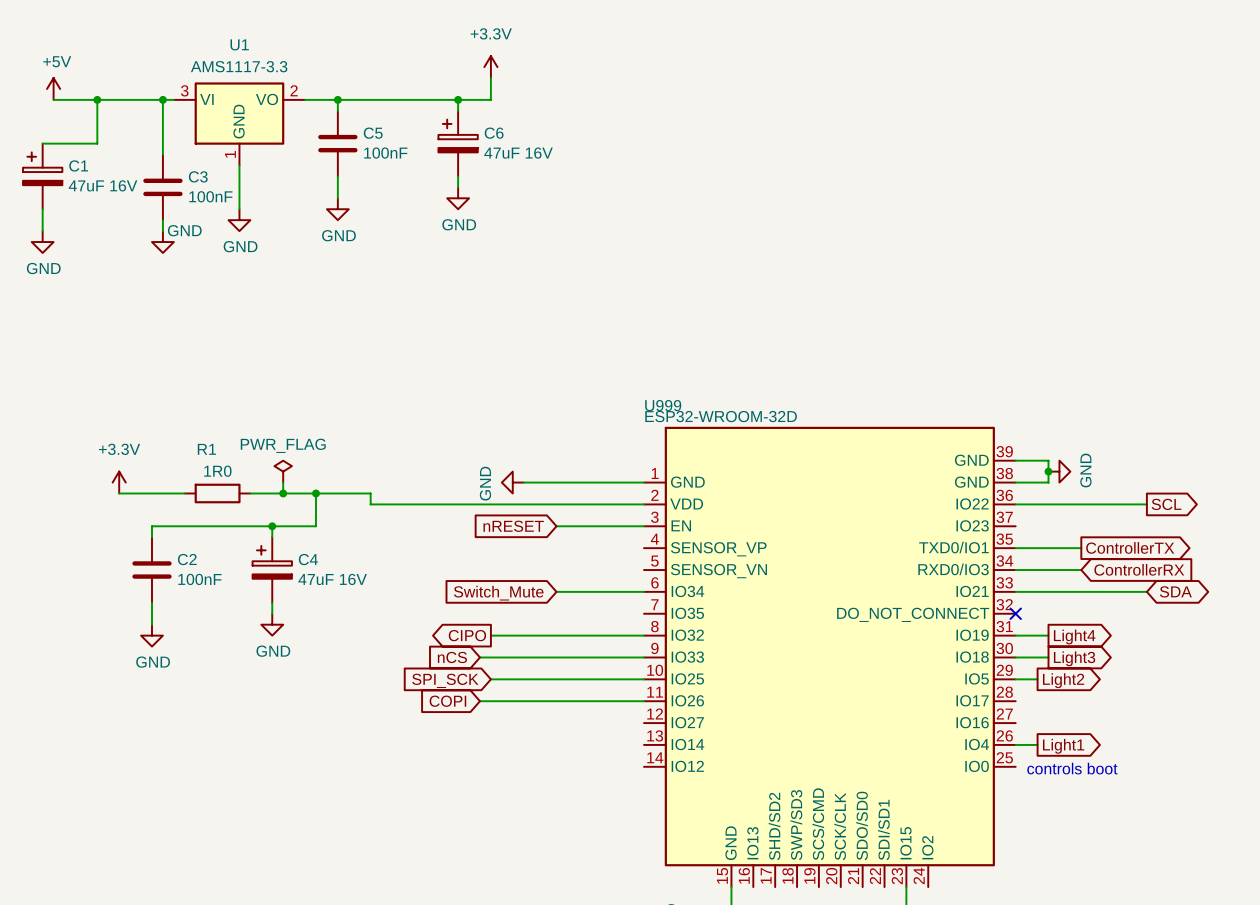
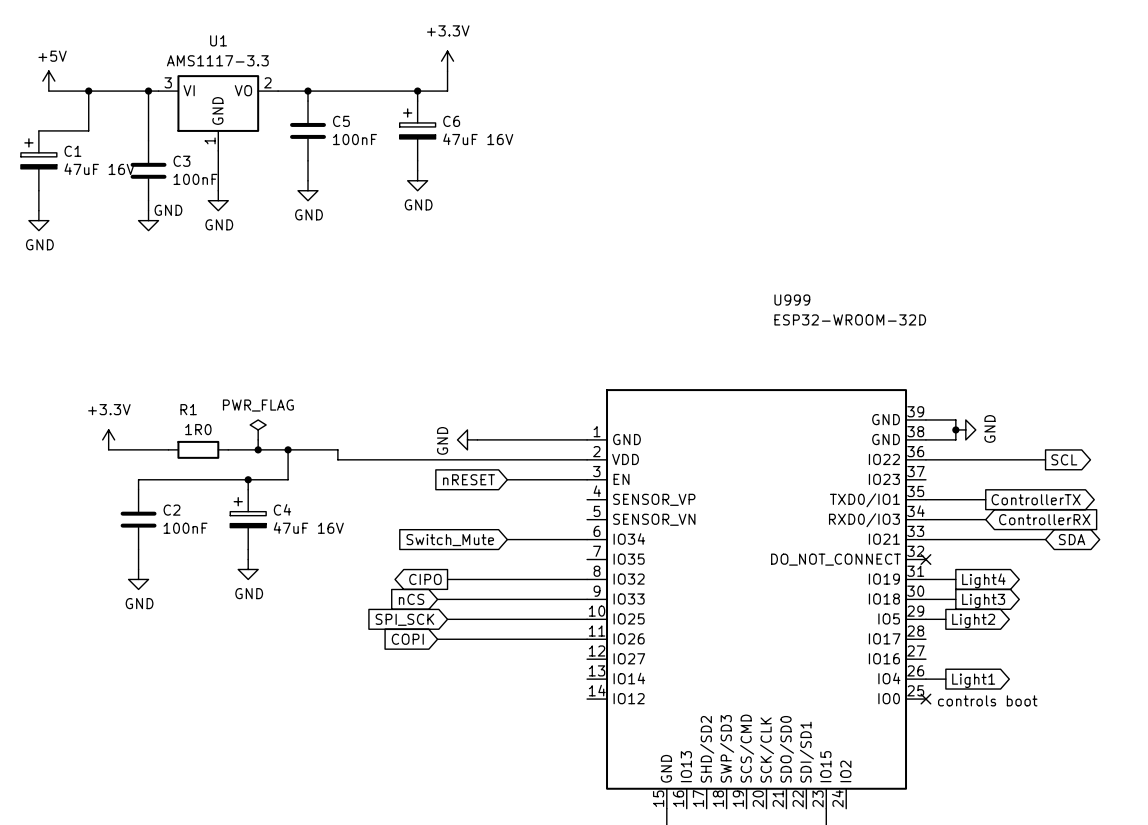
U999 name position: U999 (663, 405) -> U999 (792, 300)
U999 value position: ESP32-WROOM-32D (721, 416) -> ESP32-WROOM-32D (850, 319)
no-connect mark: none -> (925, 699)

